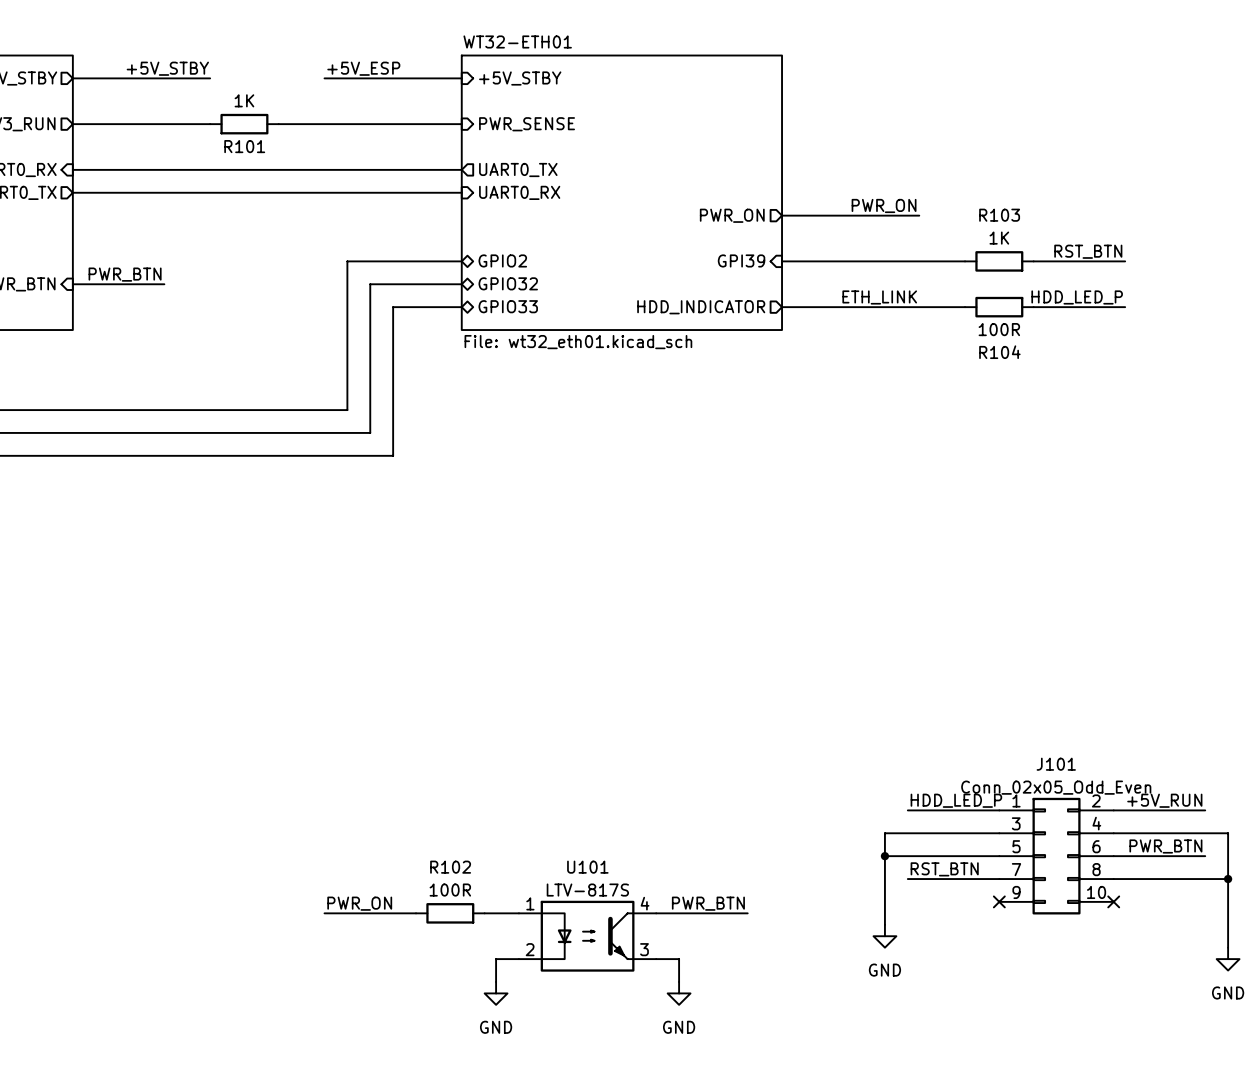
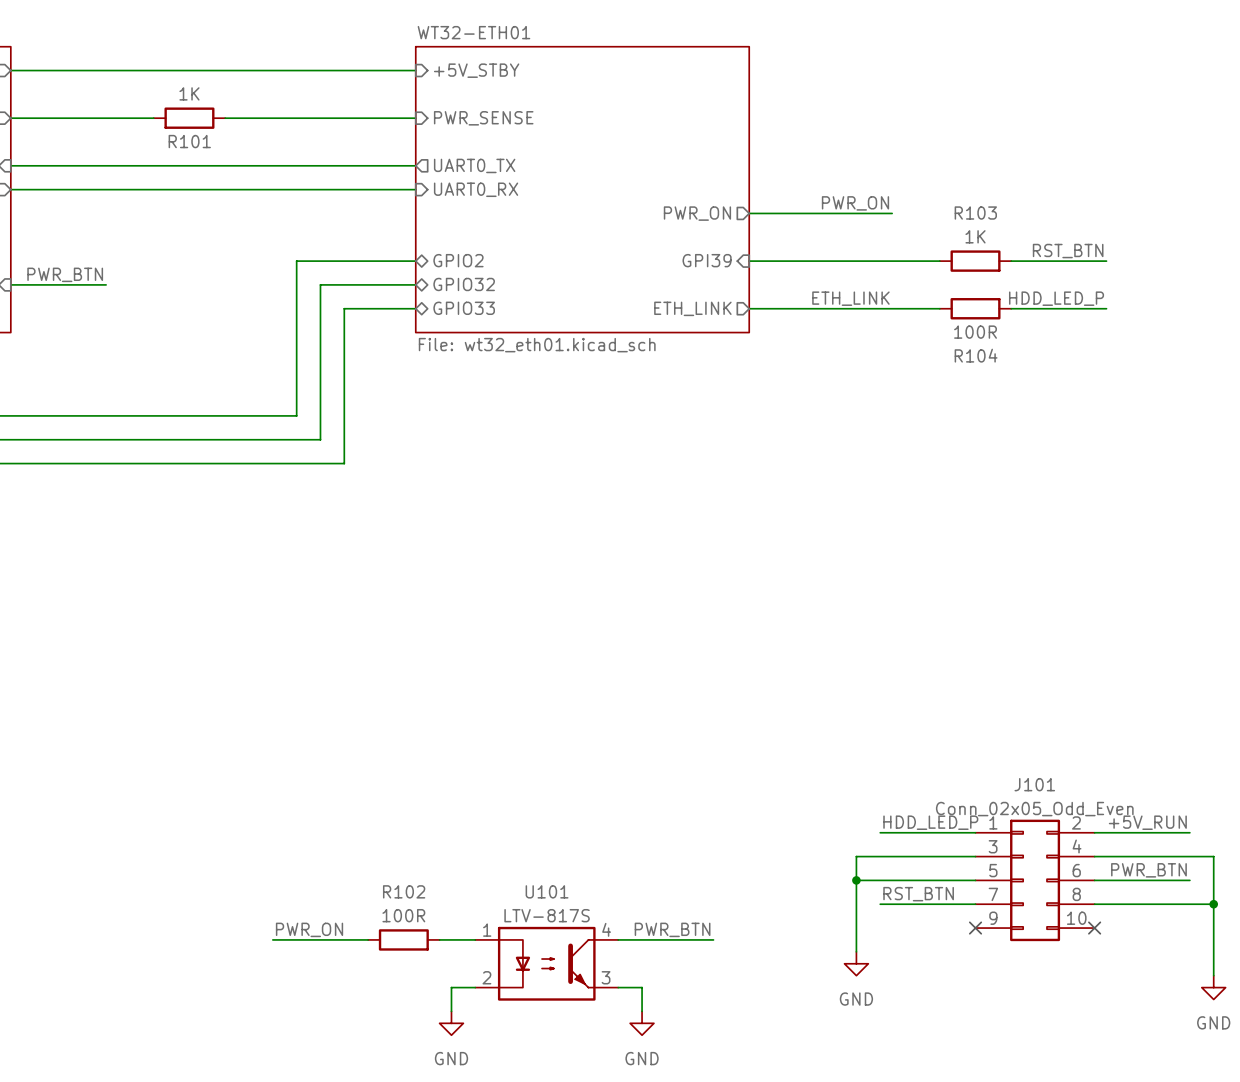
label: +5V_STBY (167, 68) -> none
label: +5V_ESP (363, 68) -> none
wire: none -> (153, 70) (272, 70)
sheet pin: HDD_INDICATOR (701, 307) -> ETH_LINK (692, 308)

